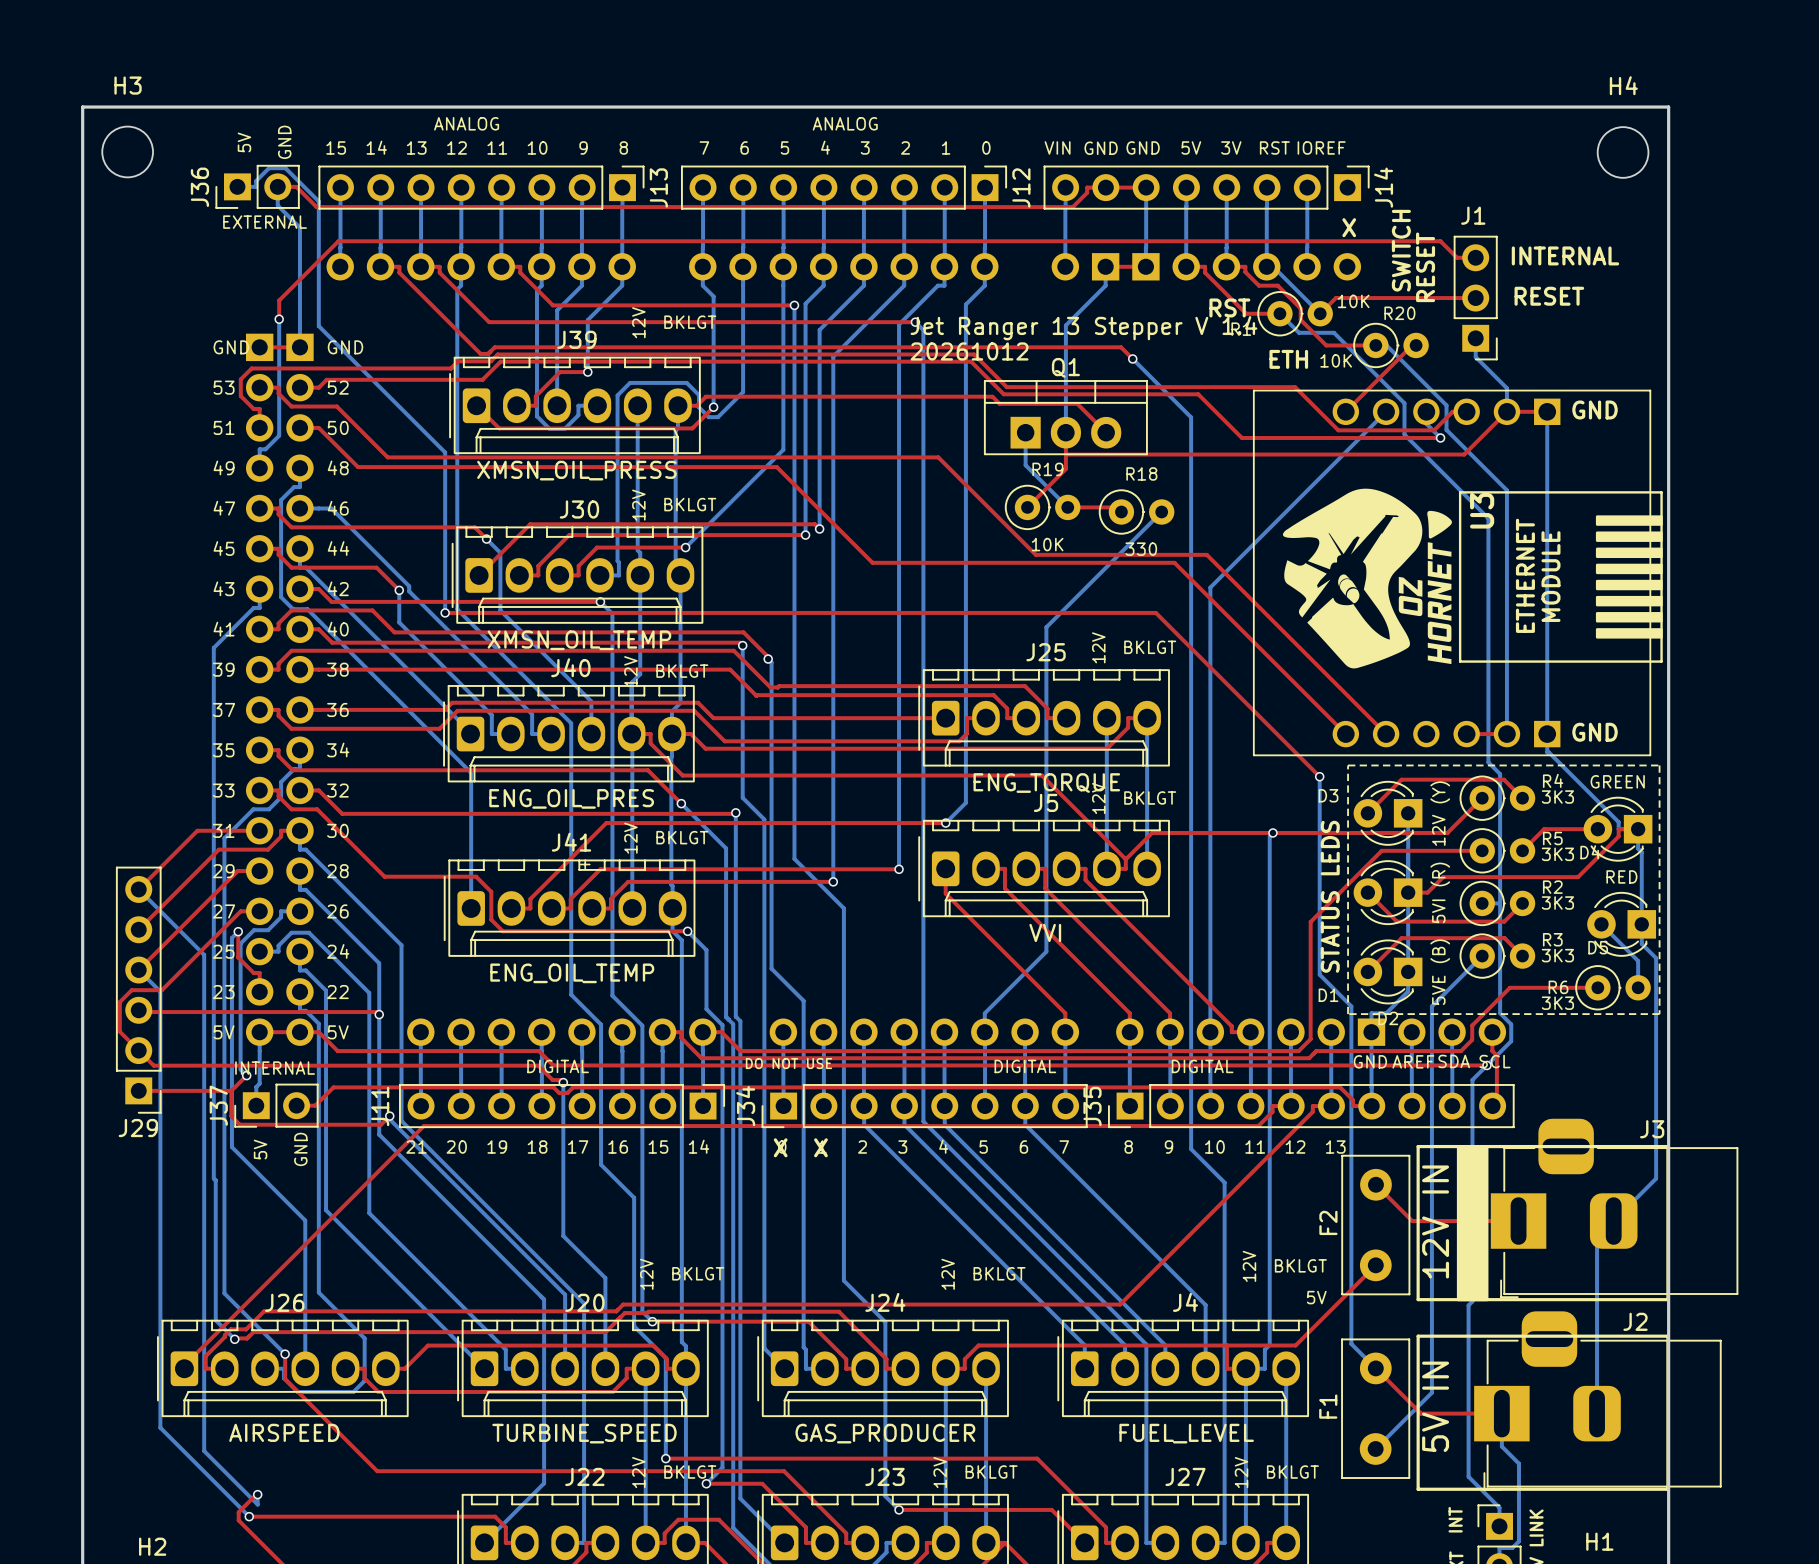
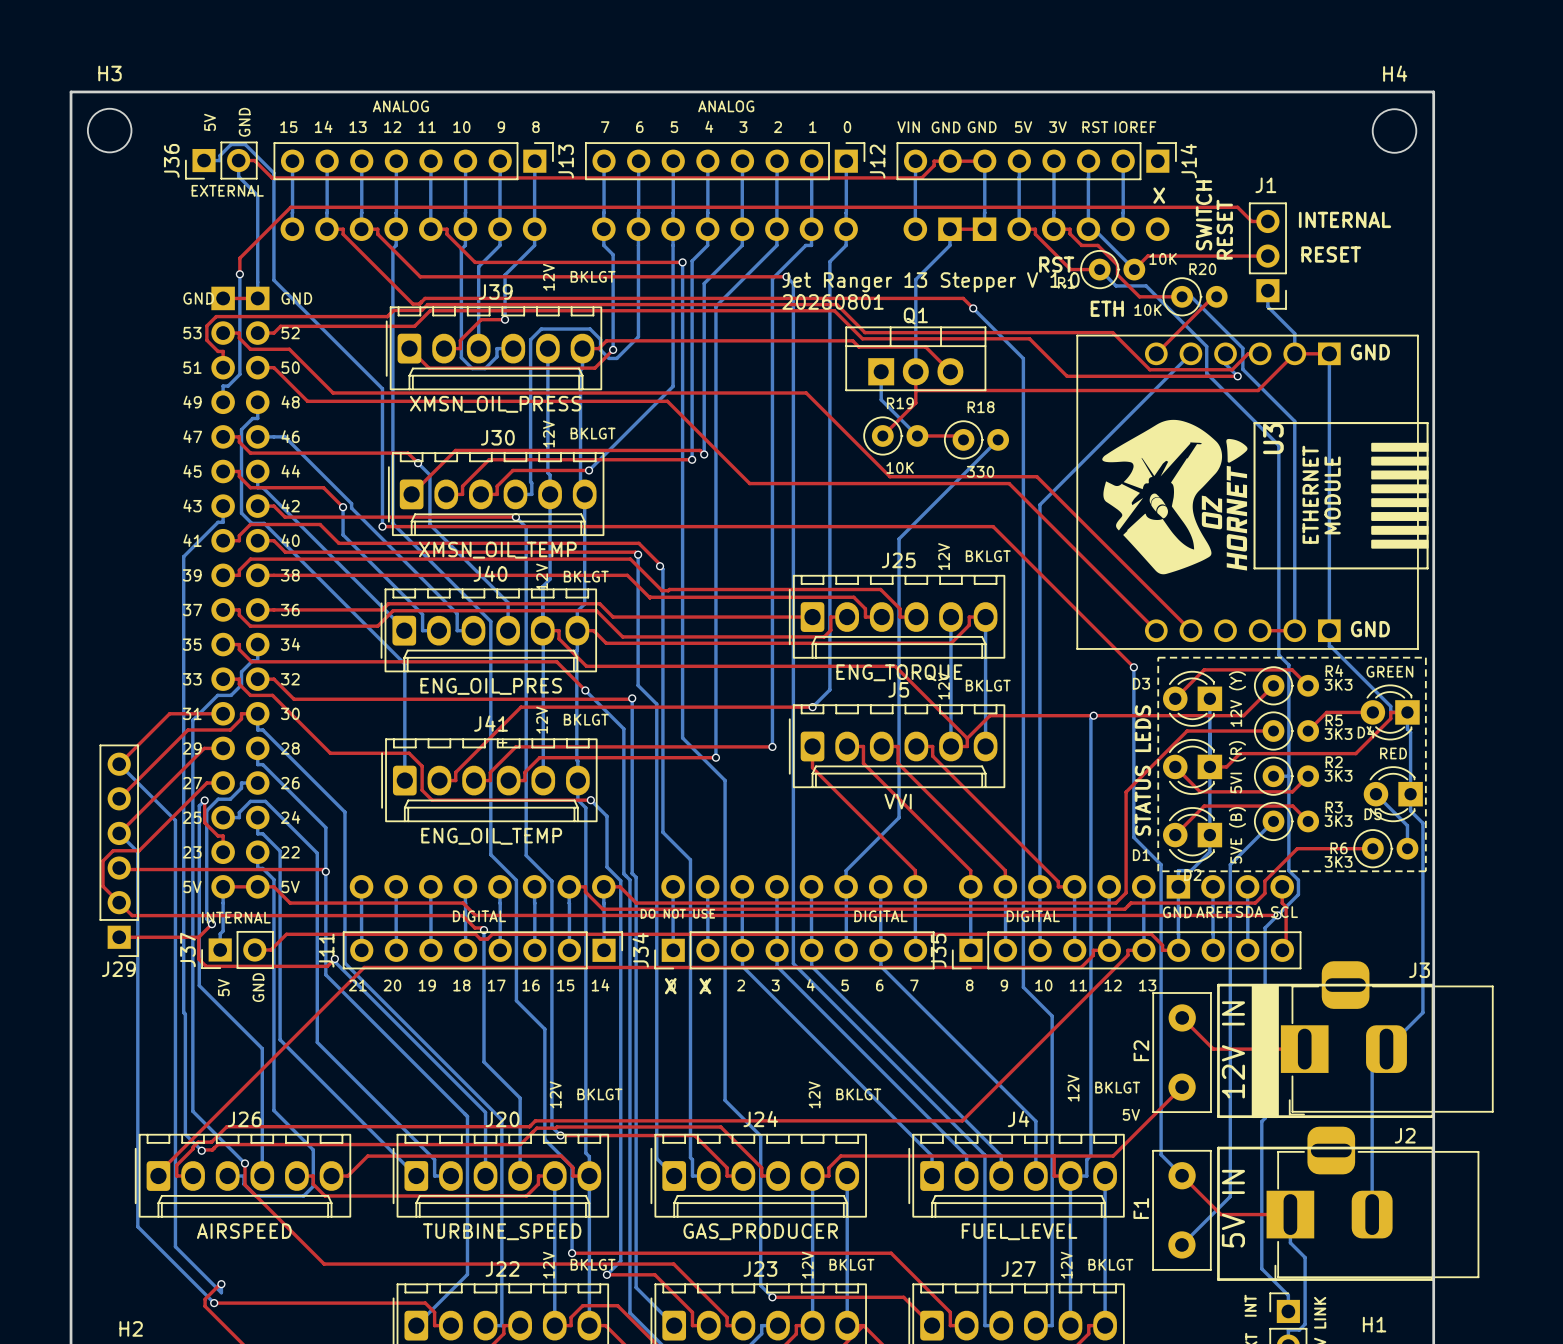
text: Jet Ranger 13 Stepper V 1.4 (1083, 328) -> Jet Ranger 13 Stepper V 1.0 (931, 282)
text: 20261012 (969, 351) -> 20260801 (833, 301)

